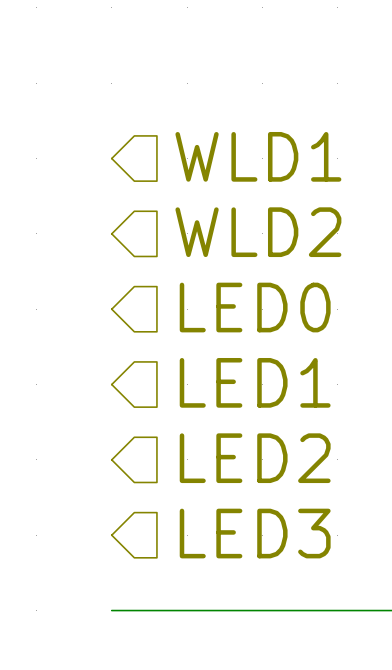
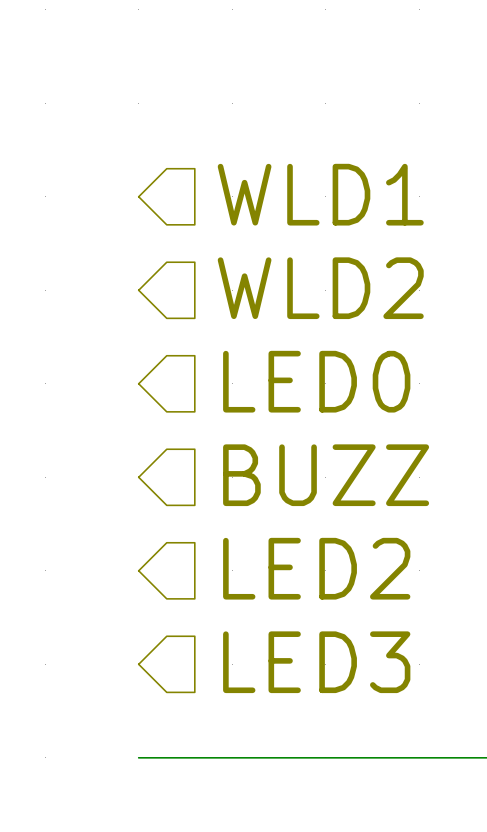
hierarchical label: LED1 (255, 382) -> BUZZ (326, 475)

